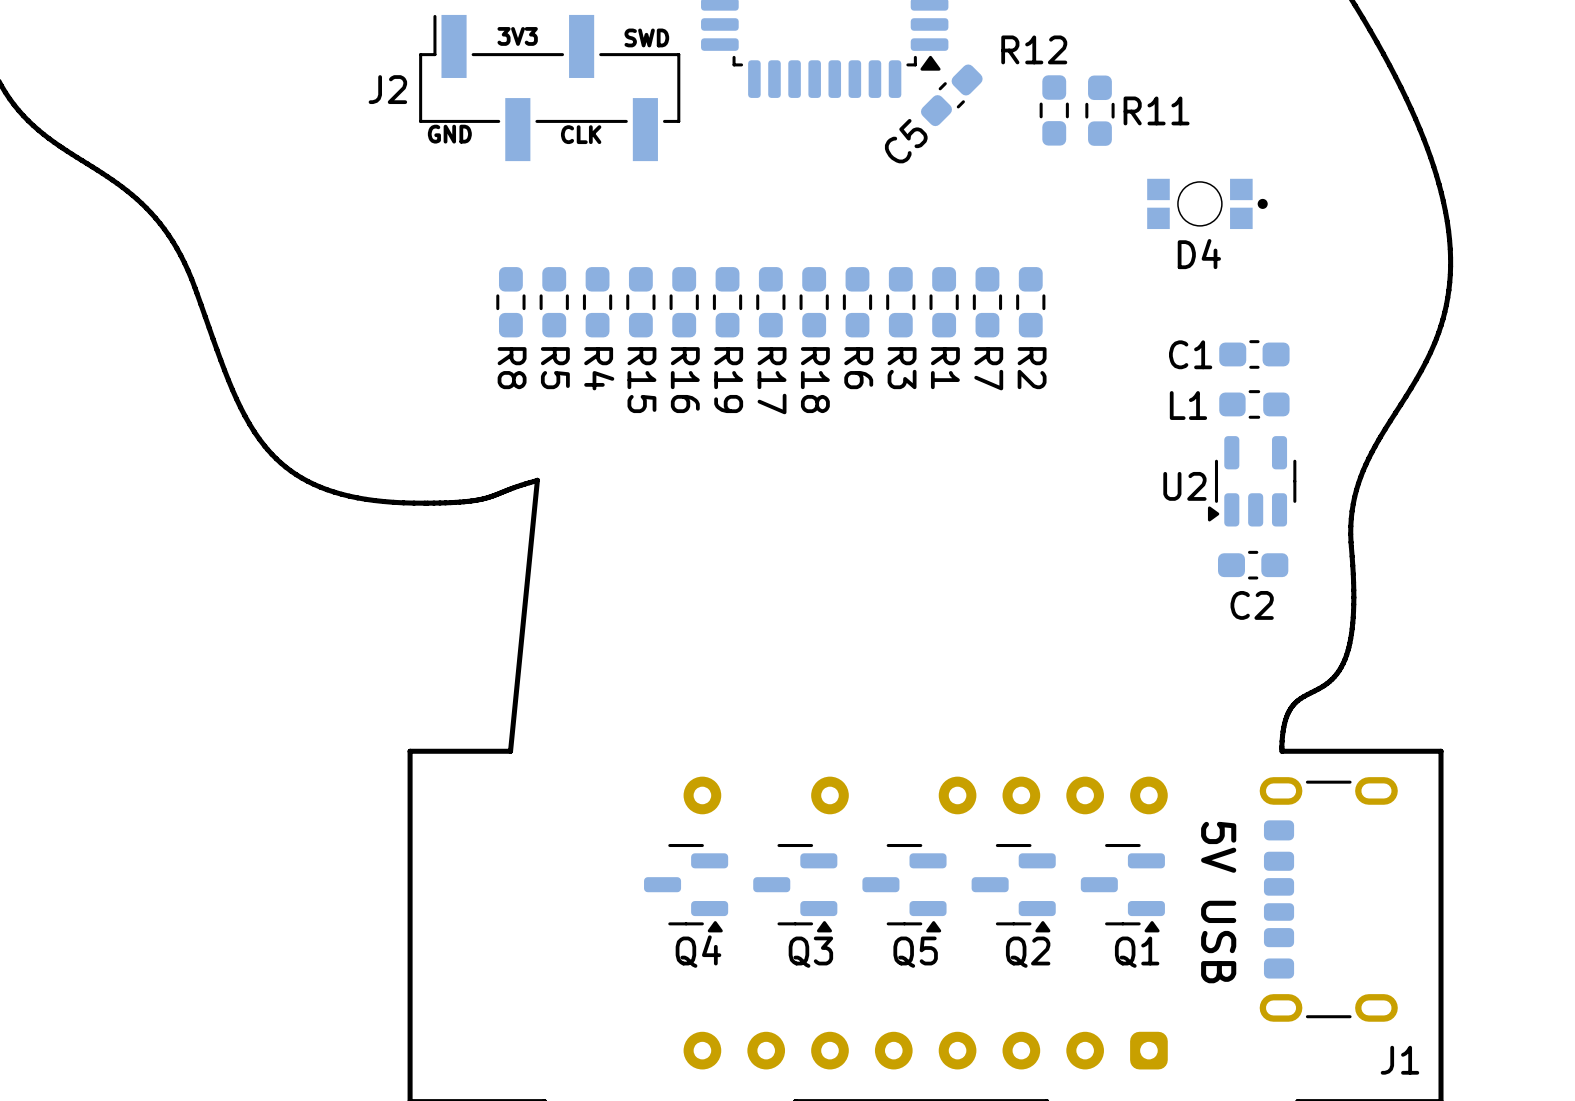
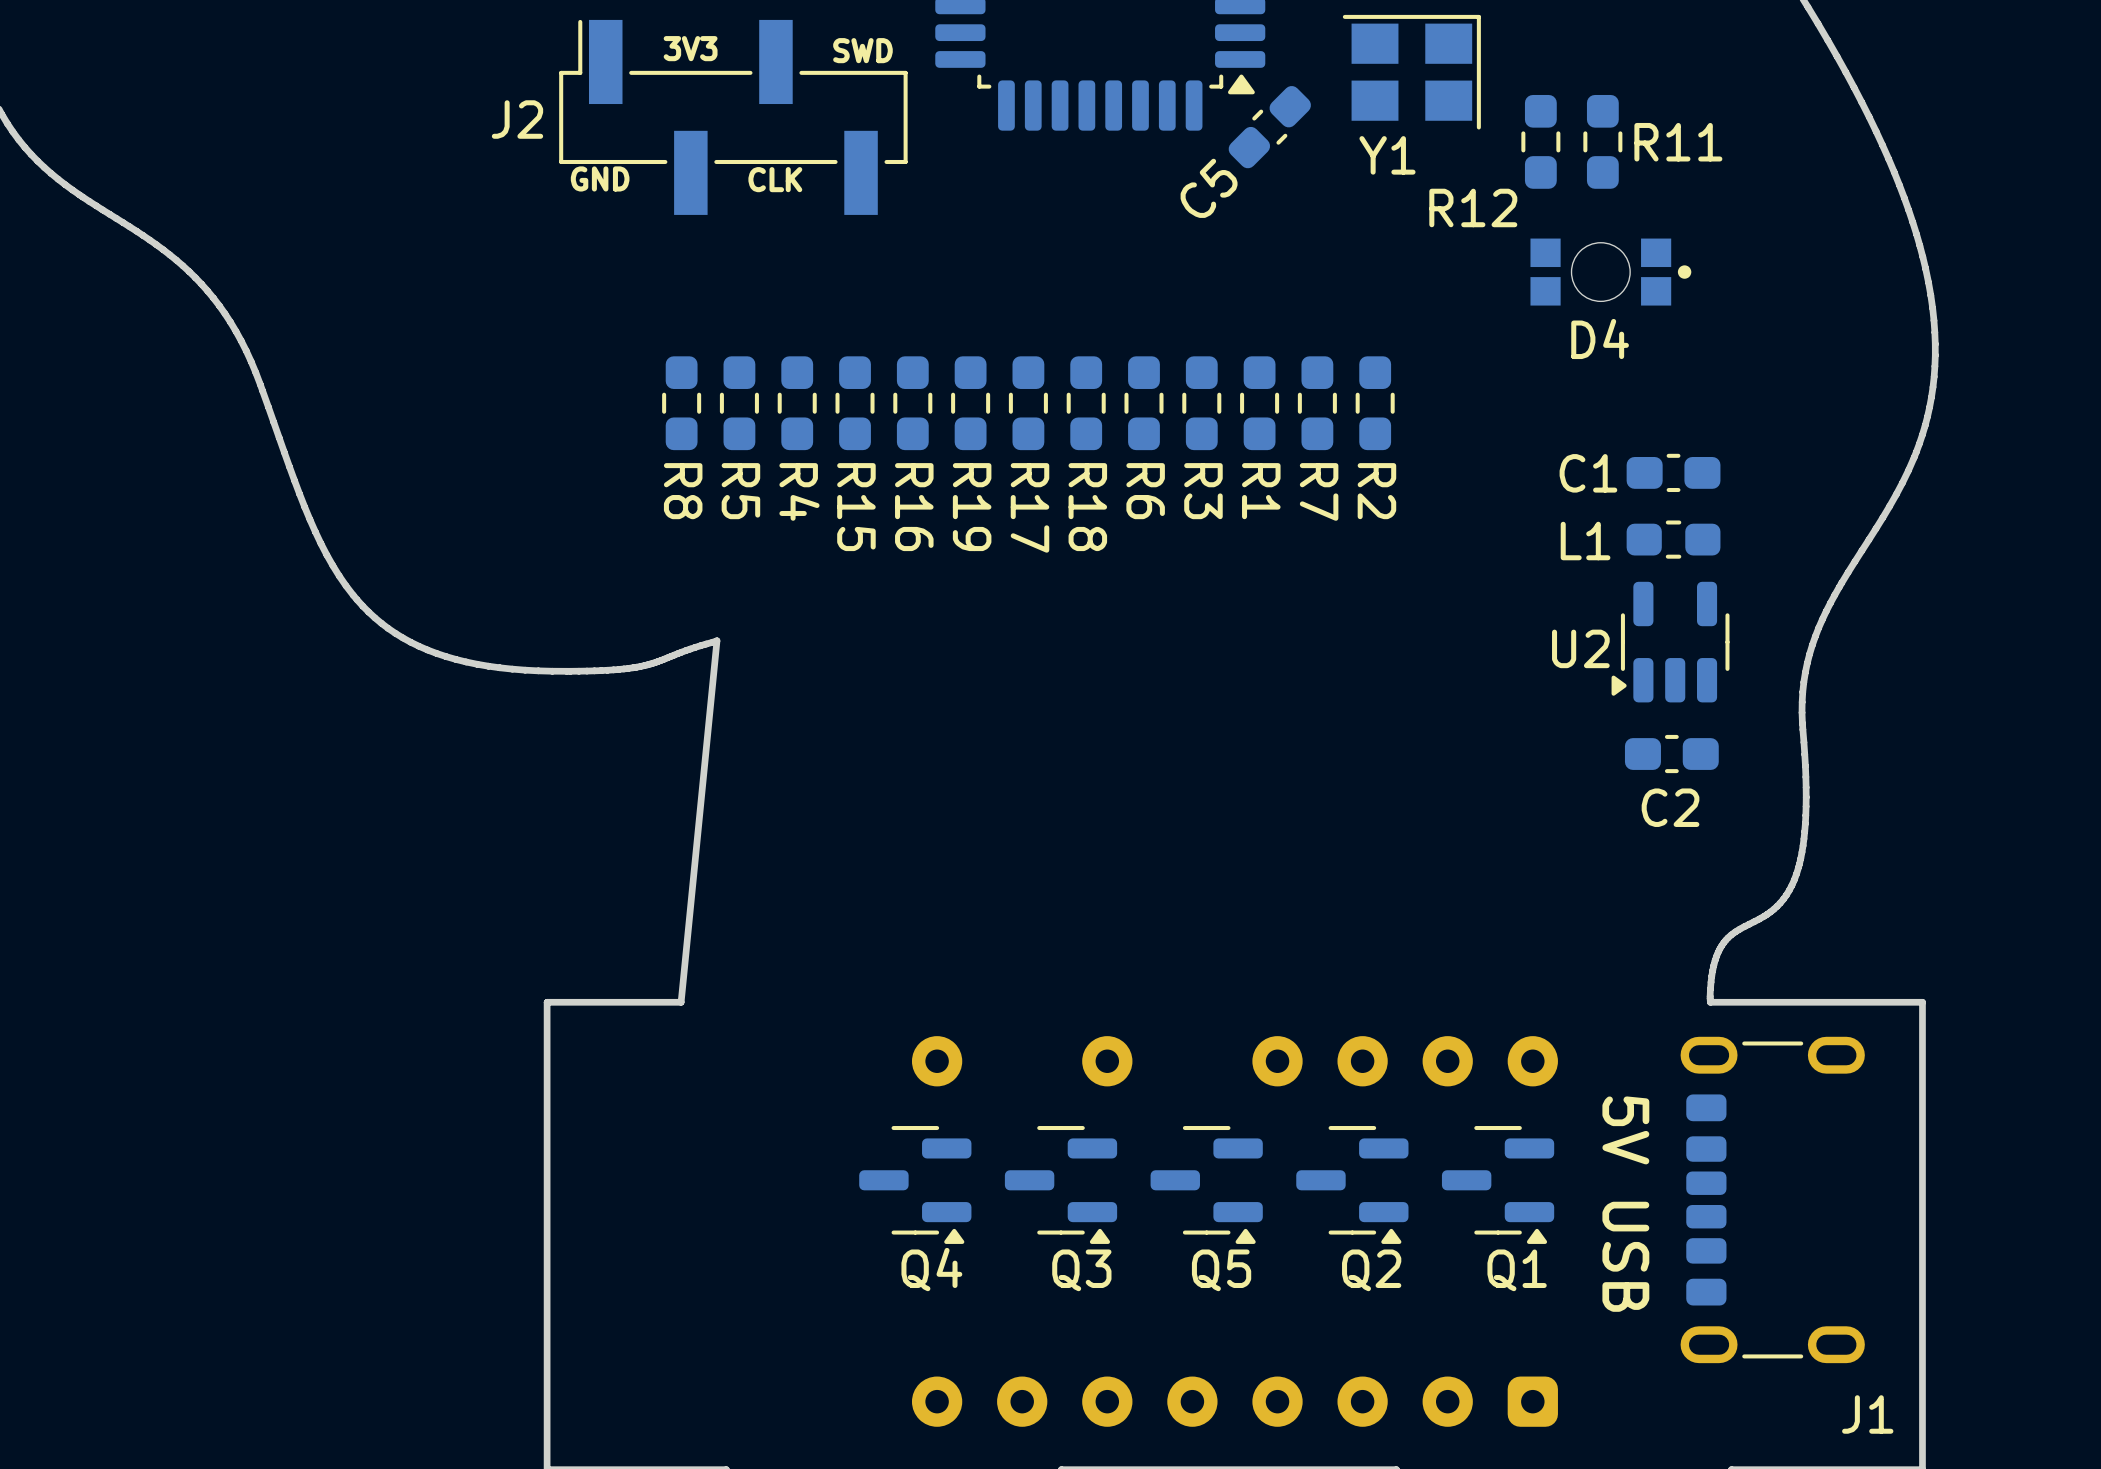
R12 name position: R12 (1034, 49) -> R12 (1473, 207)
Y1: none -> (1411, 72)
R12 position: (1054, 110) -> (1540, 141)
R11 position: (1099, 110) -> (1602, 141)

